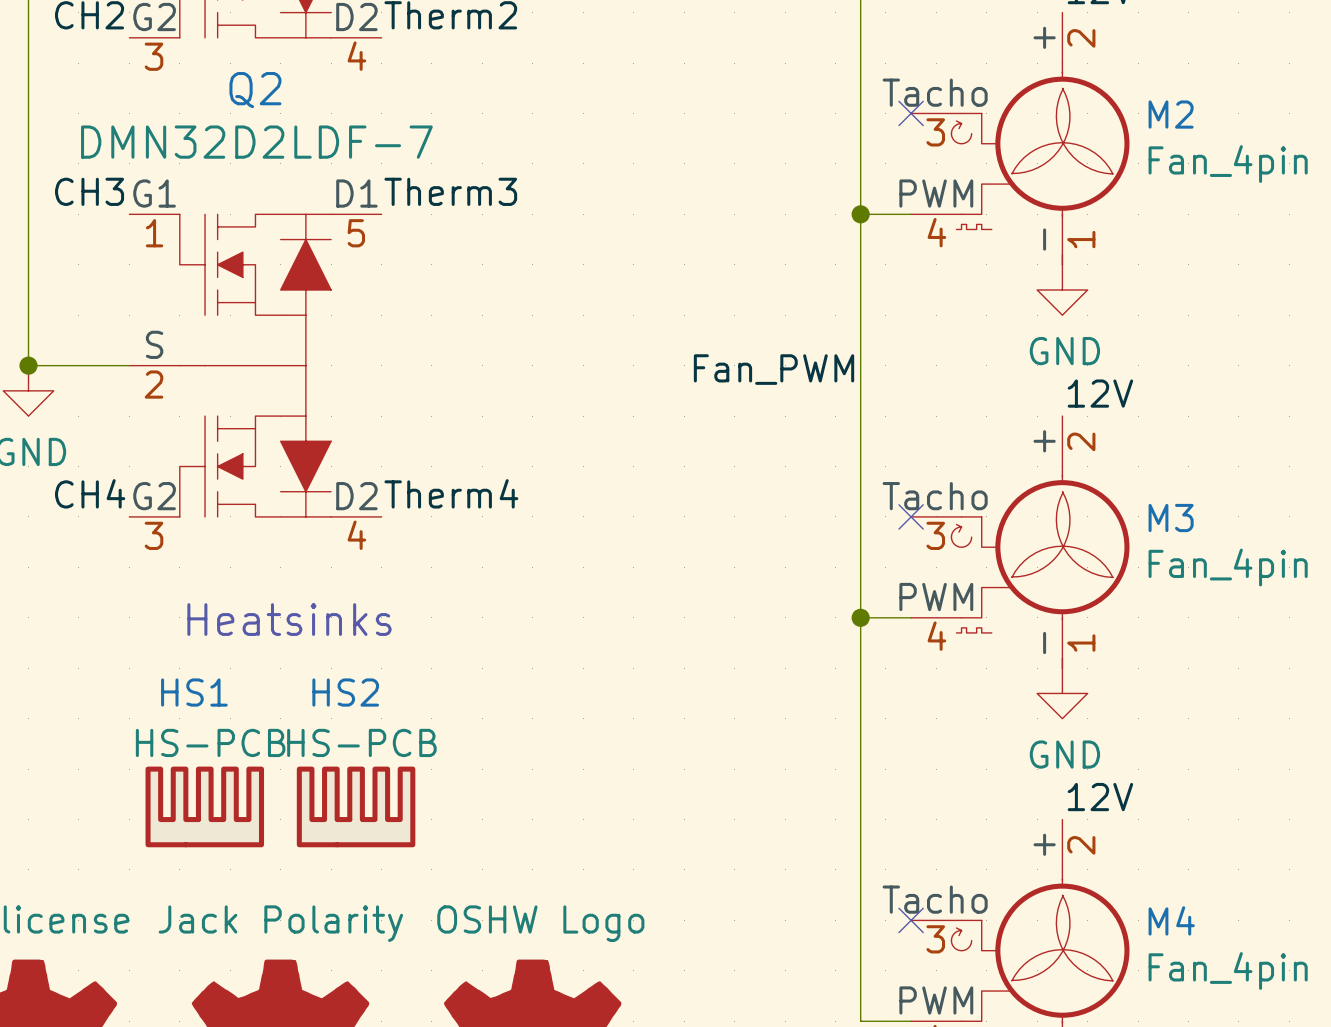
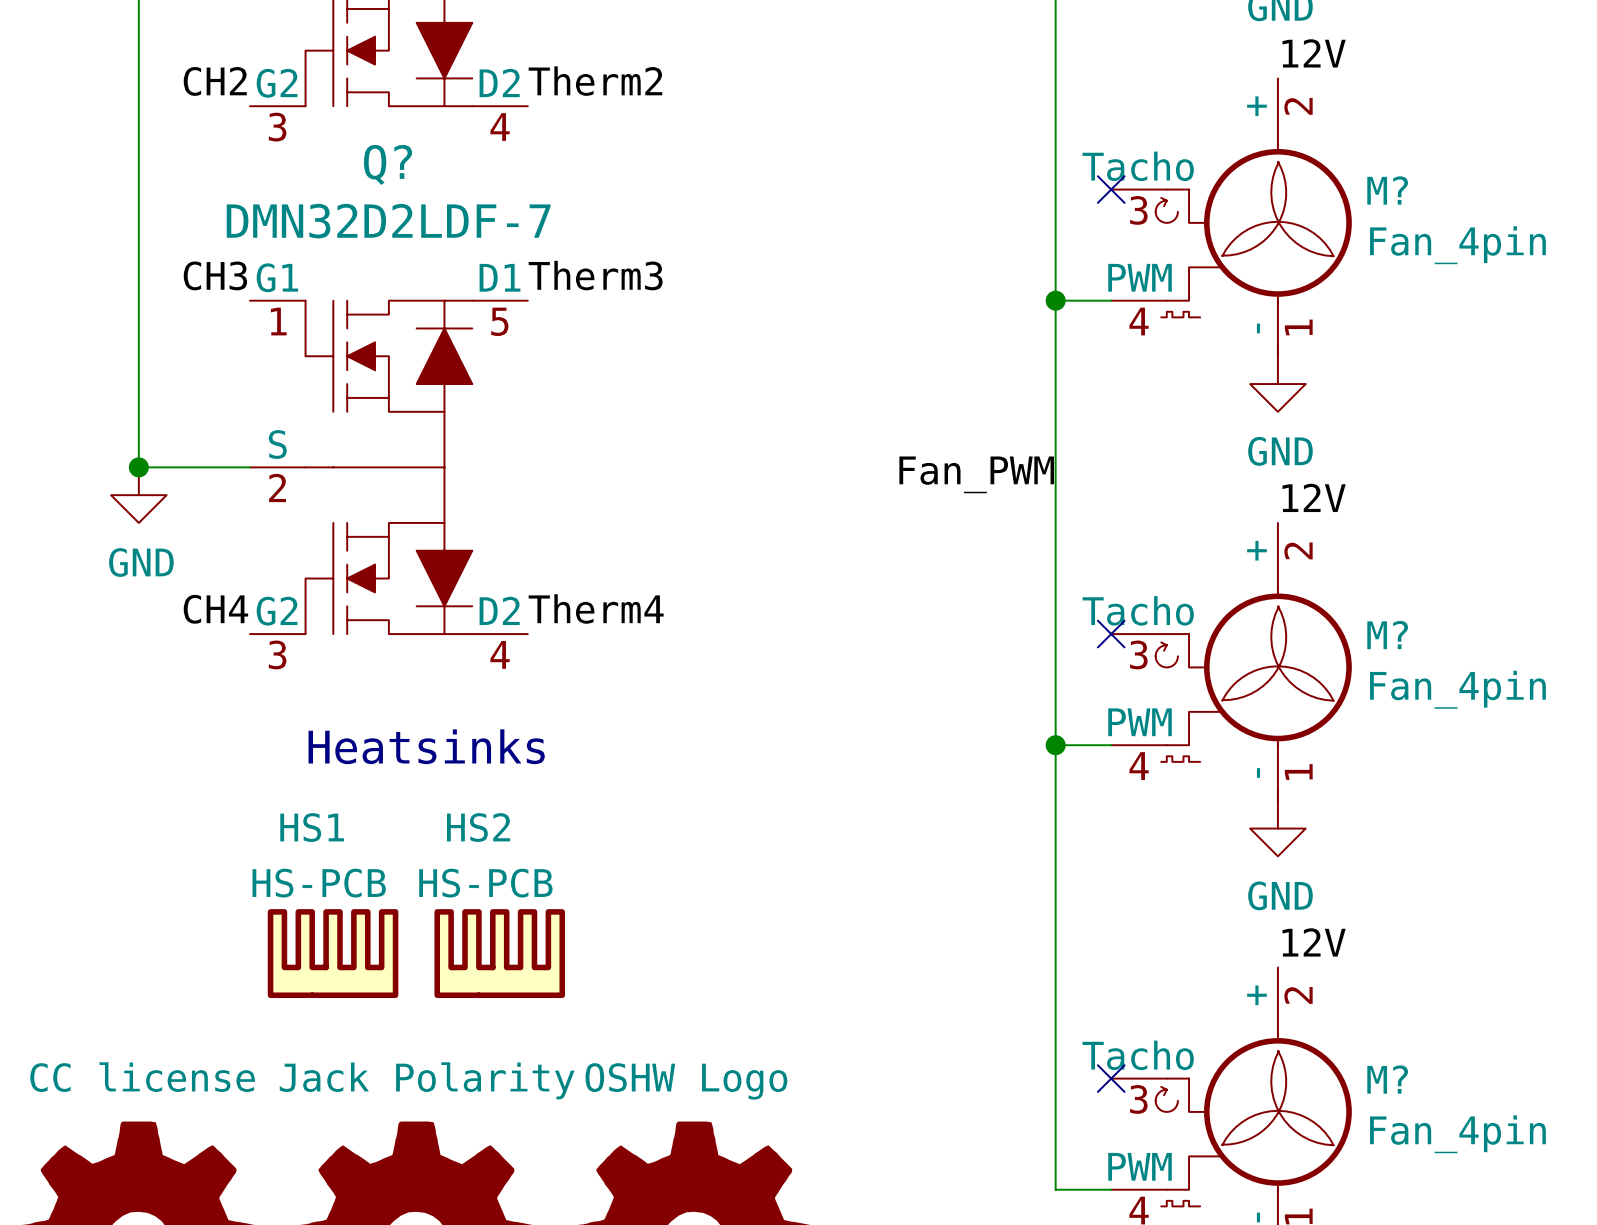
Q2 name: Q2 (255, 90) -> Q? (388, 164)
M2 name: M2 (1171, 114) -> M? (1387, 190)
M3 name: M3 (1171, 518) -> M? (1387, 635)
M4 name: M4 (1171, 920) -> M? (1387, 1079)

